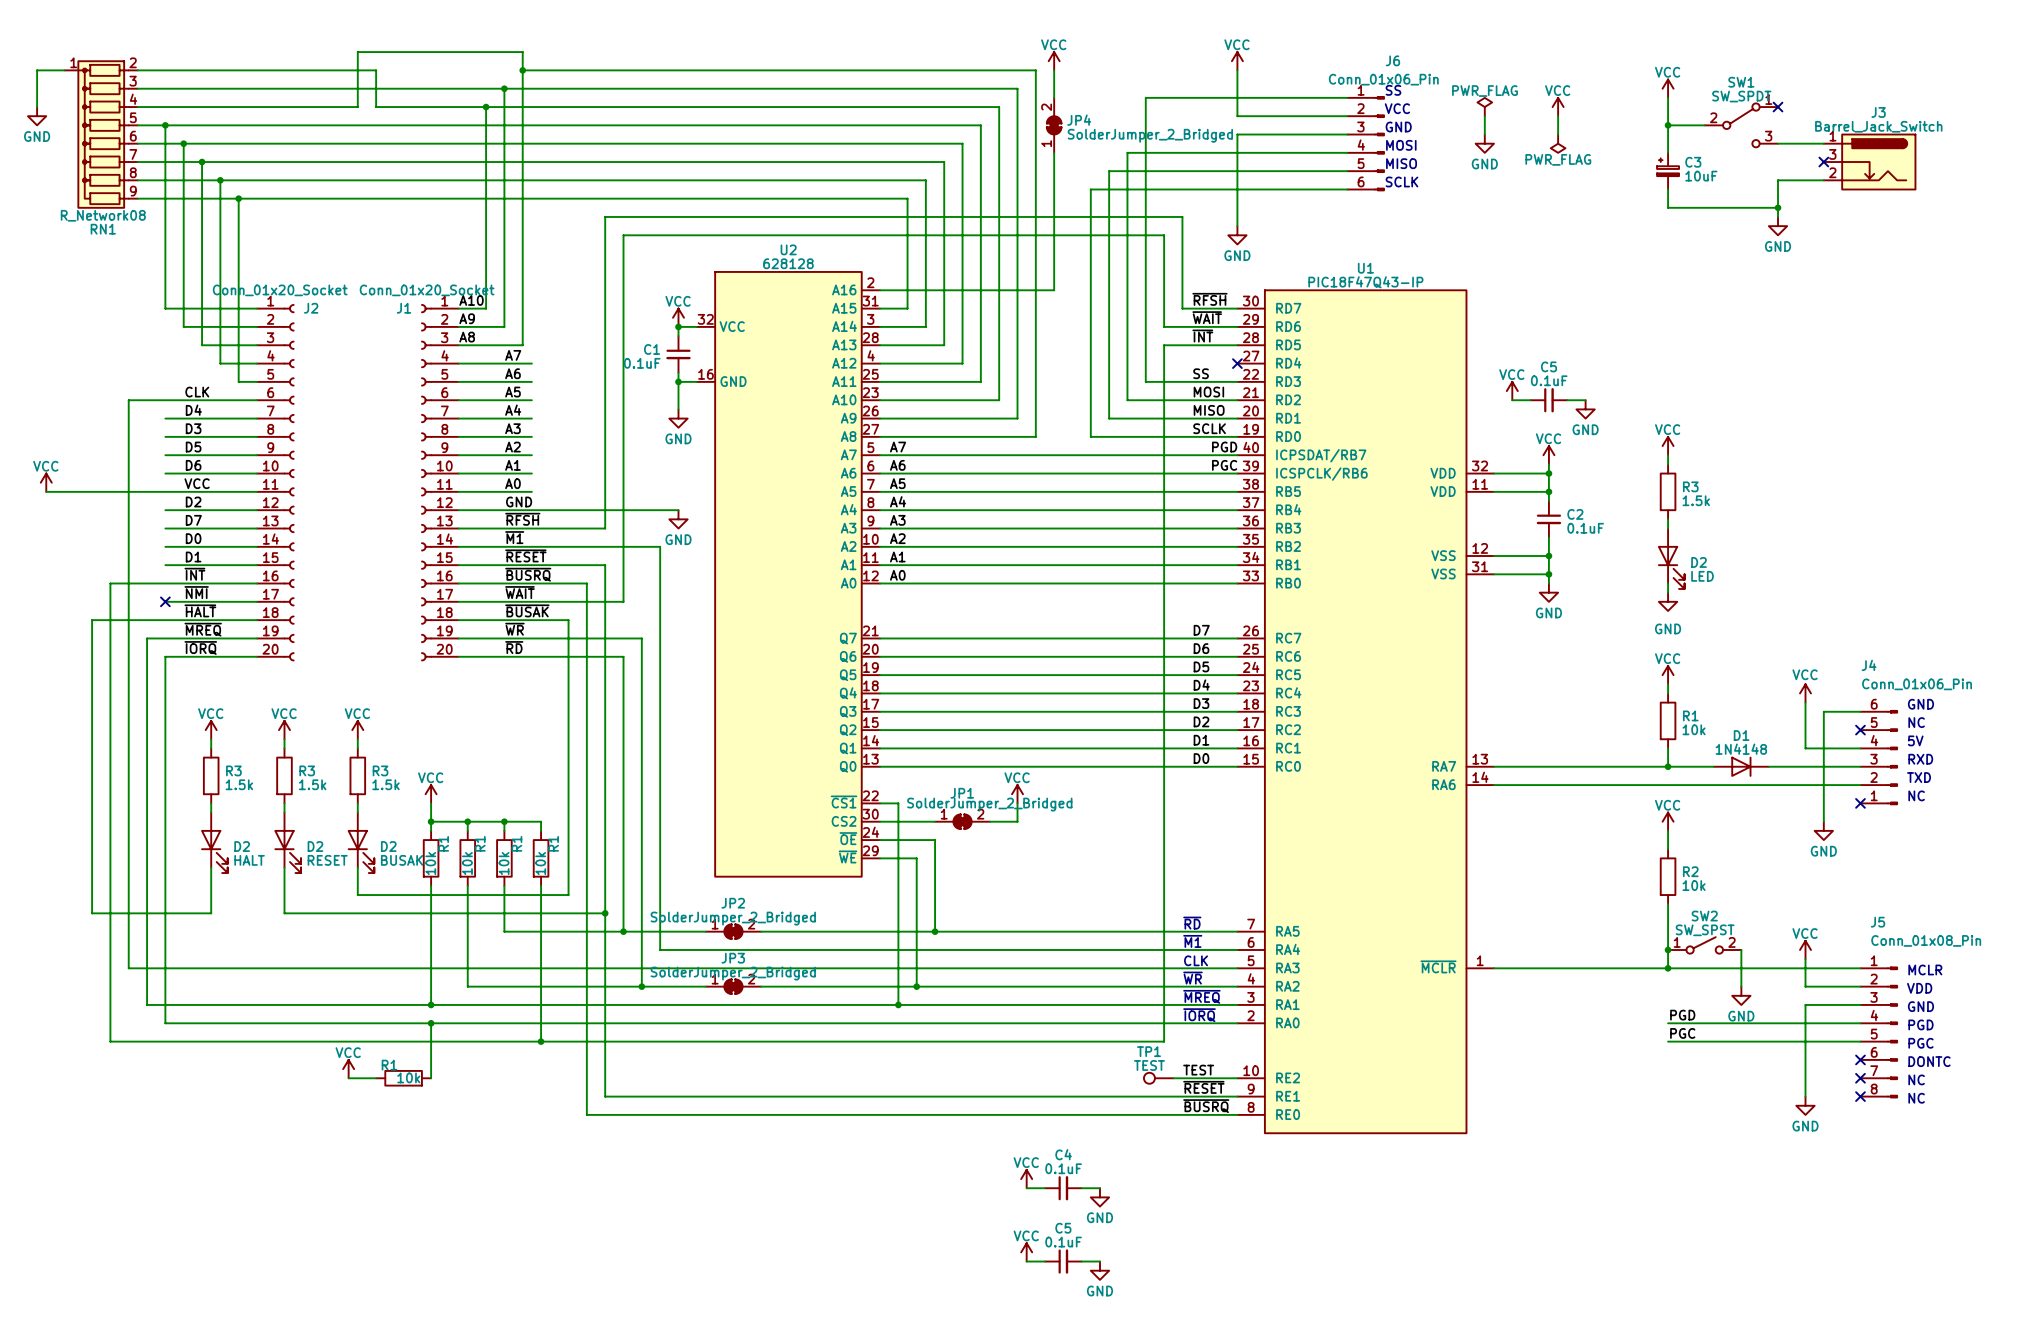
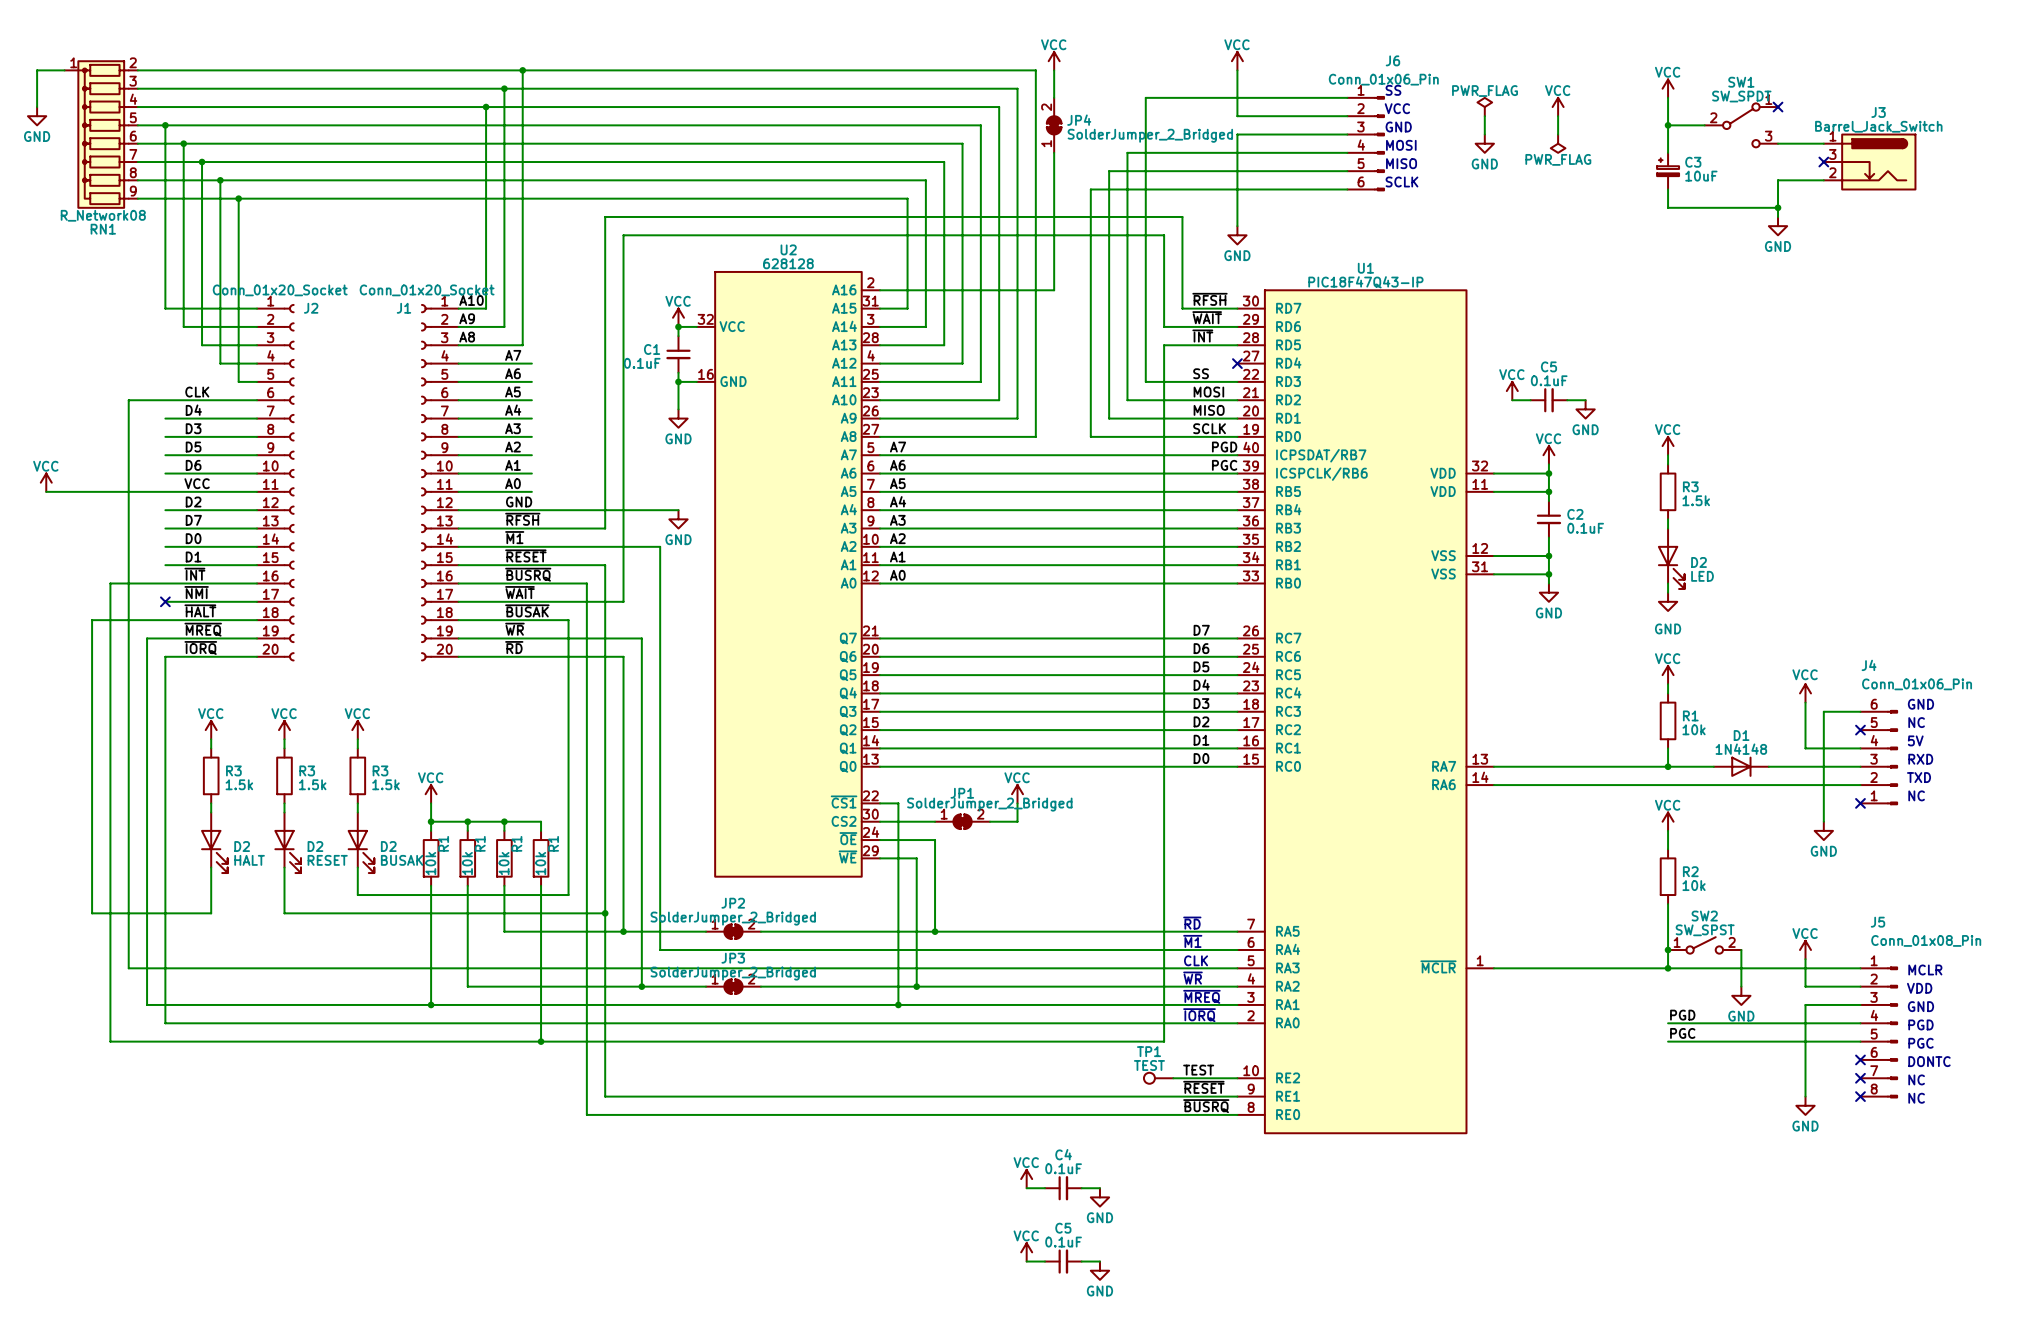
wire: (376, 70) (376, 107) -> (357, 107) (376, 107)
wire: (522, 70) (522, 52) (357, 52) (357, 107) -> (522, 70) (376, 70)
wire: (431, 1023) (431, 1078) -> none
junction: (431, 1023) -> none
power symbol: VCC (348, 1069) -> none
wire: (348, 1078) (376, 1078) -> none
R1: 10k (403, 1078) -> none

